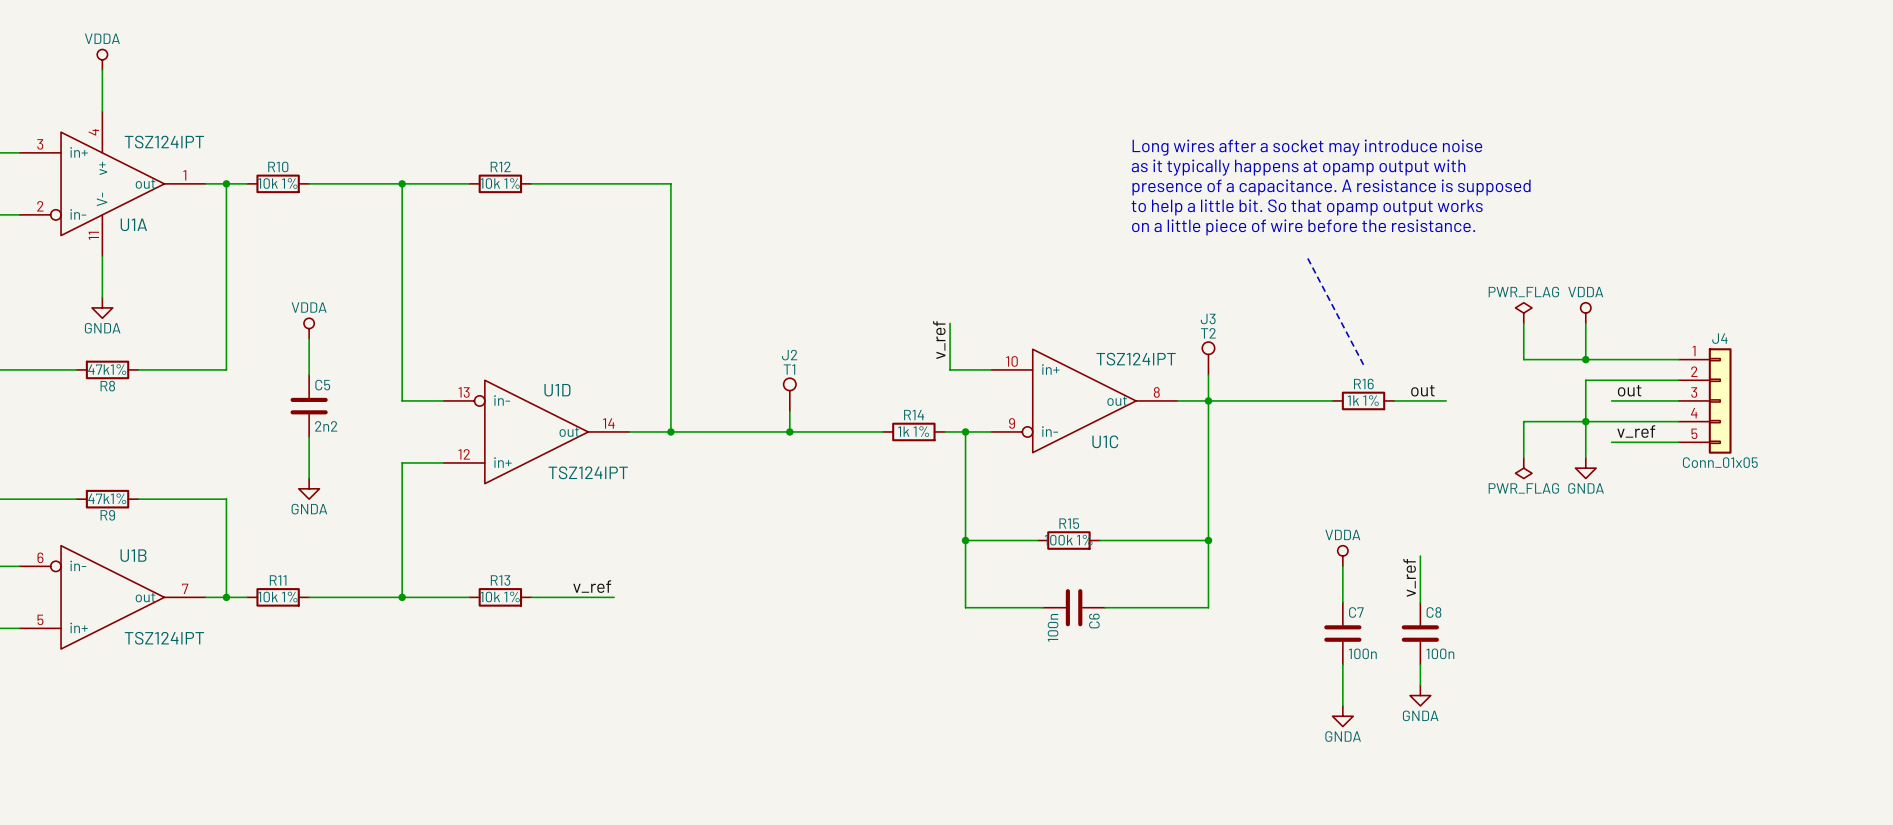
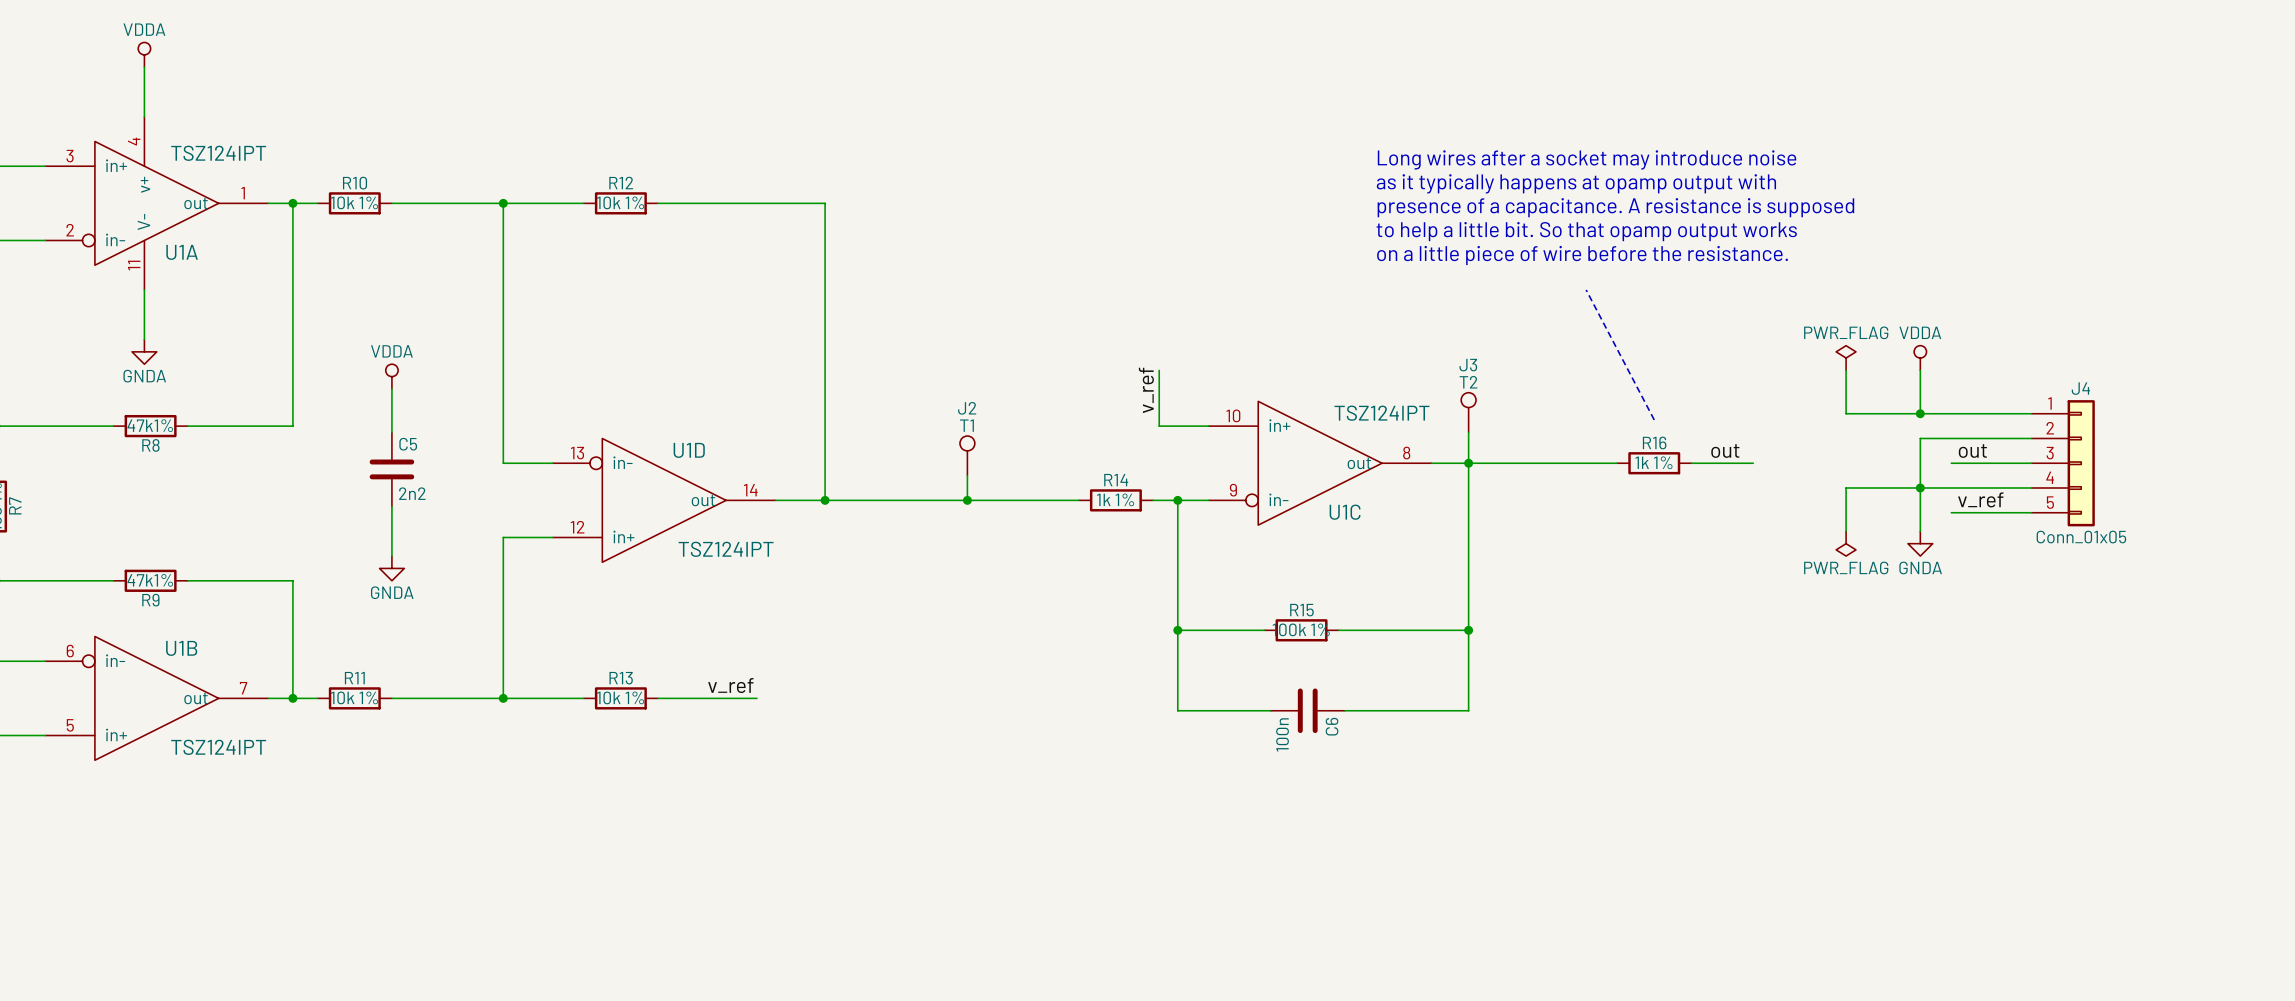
power symbol: VDDA (1342, 556) -> none
wire: (1420, 556) (1420, 602) -> none
wire: (1342, 566) (1342, 602) -> none
label: v_ref (1409, 577) -> none
C7: 100n (1342, 633) -> none
C8: 100n (1420, 633) -> none
wire: (1342, 664) (1342, 705) -> none
wire: (1420, 664) (1420, 685) -> none
power symbol: GNDA (1420, 695) -> none
power symbol: GNDA (1342, 716) -> none

